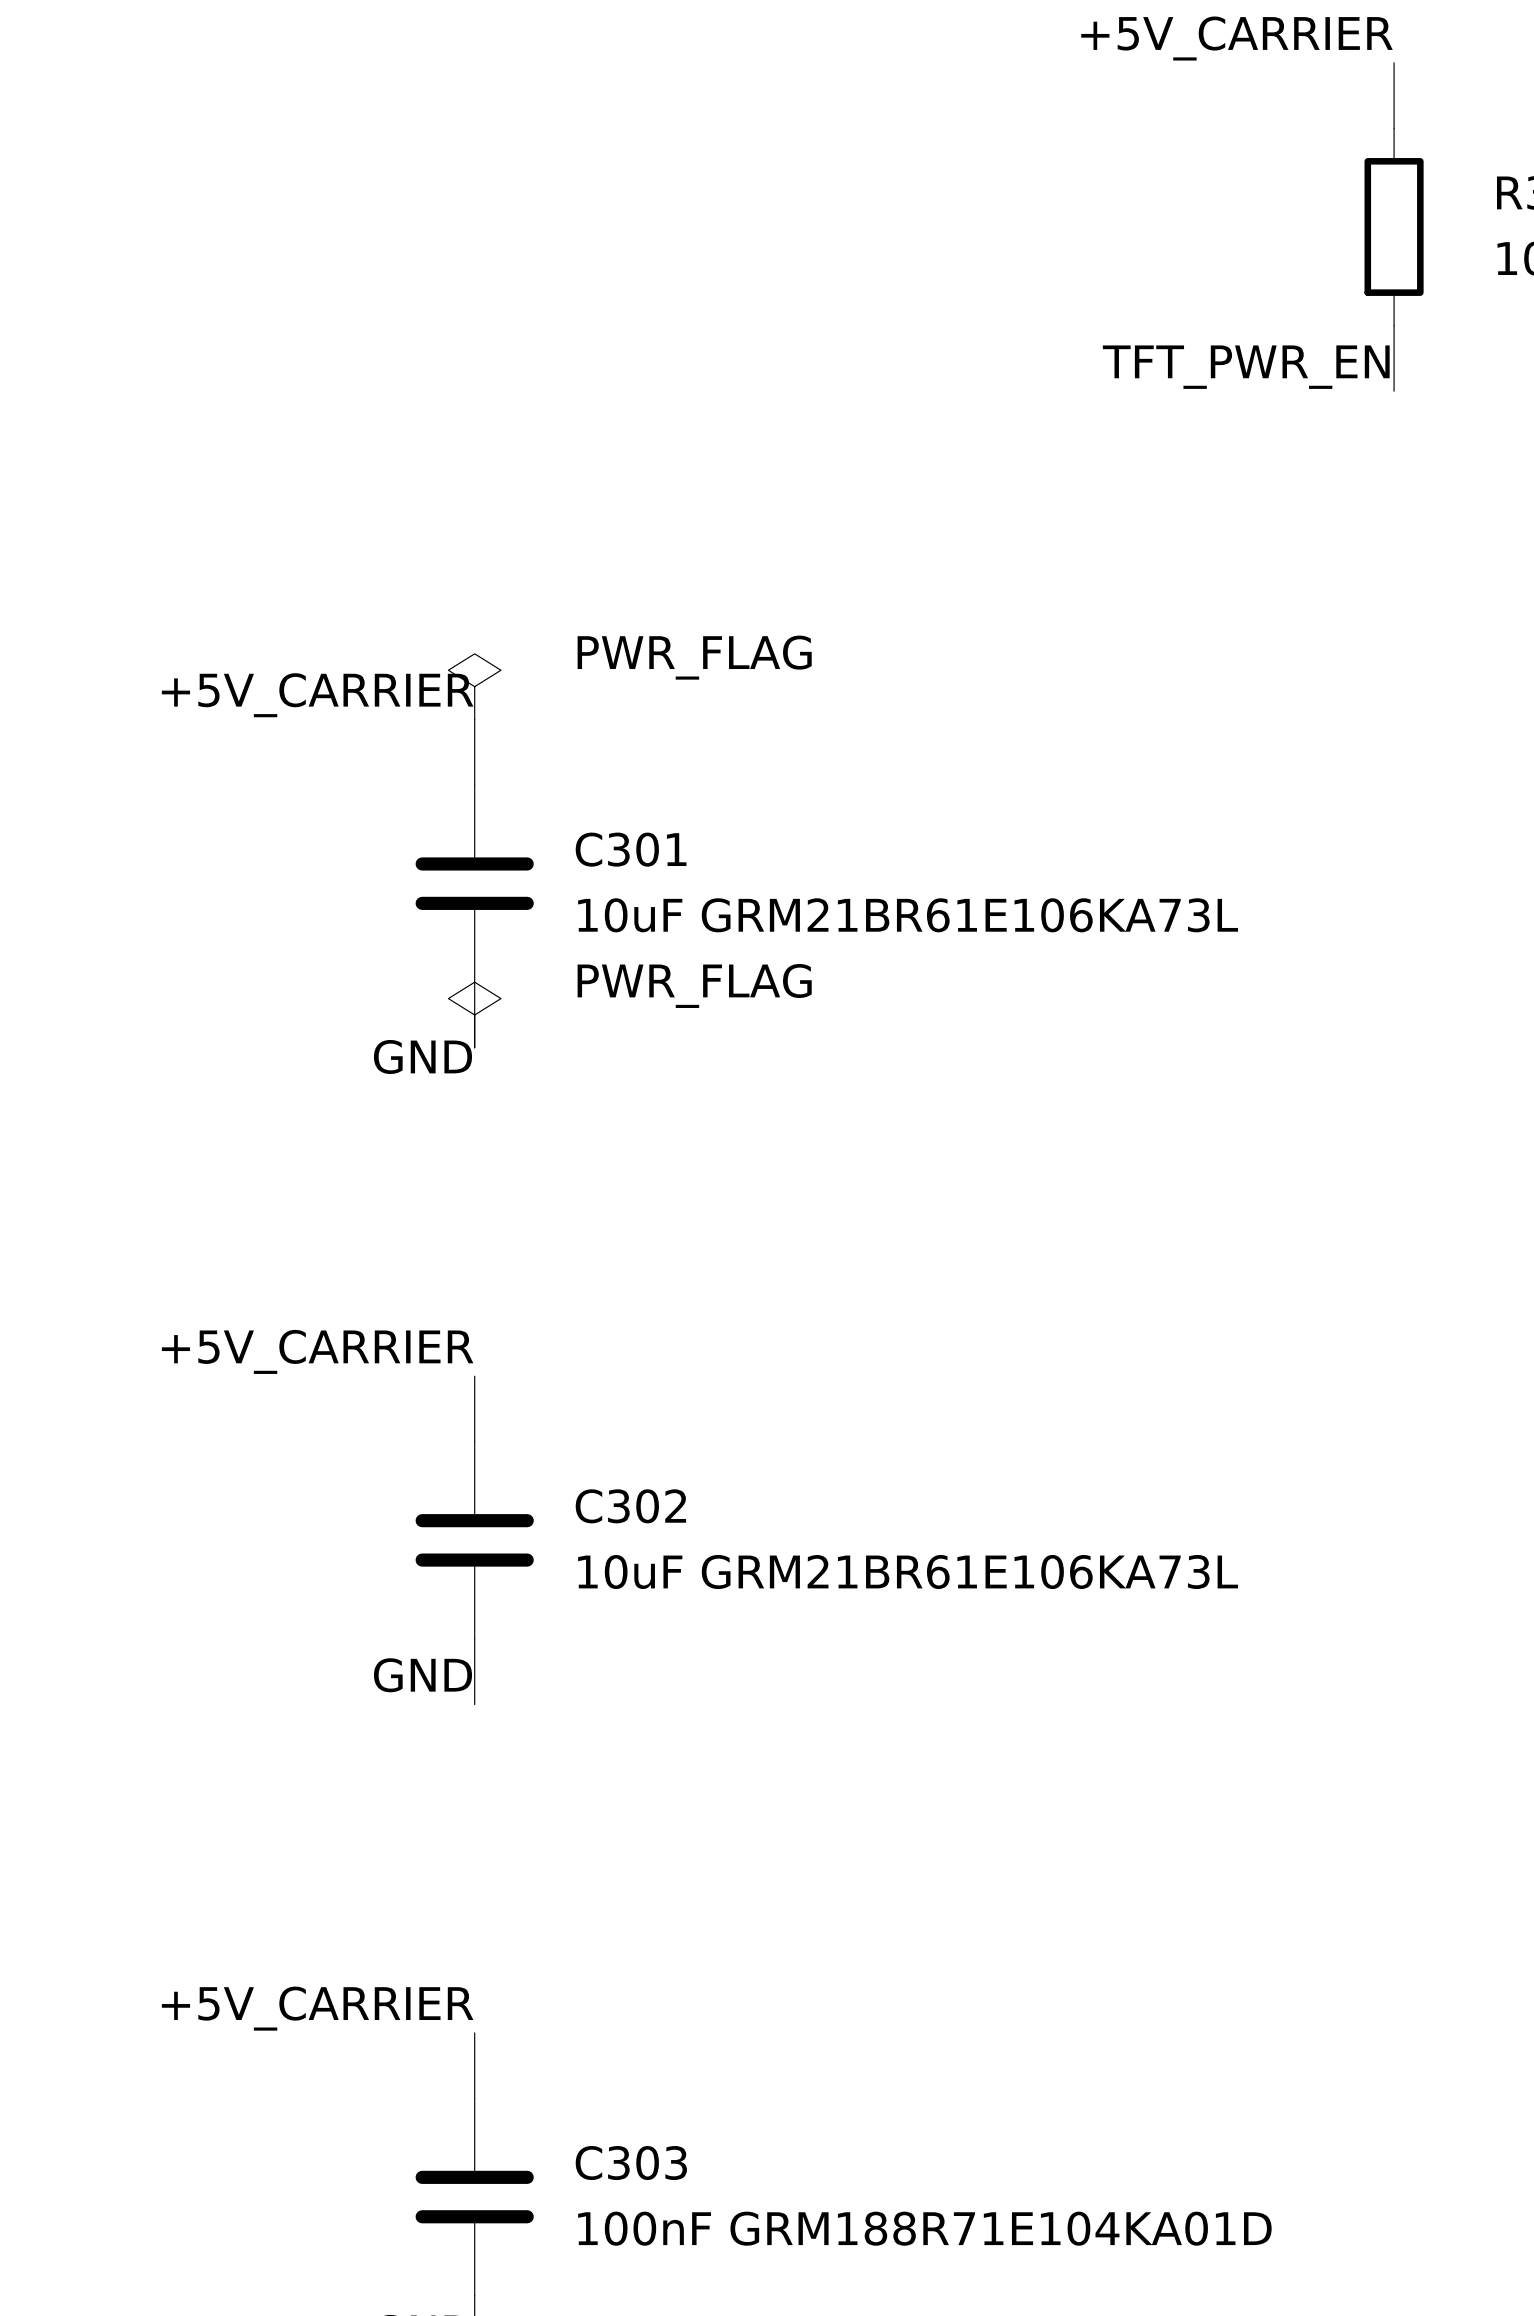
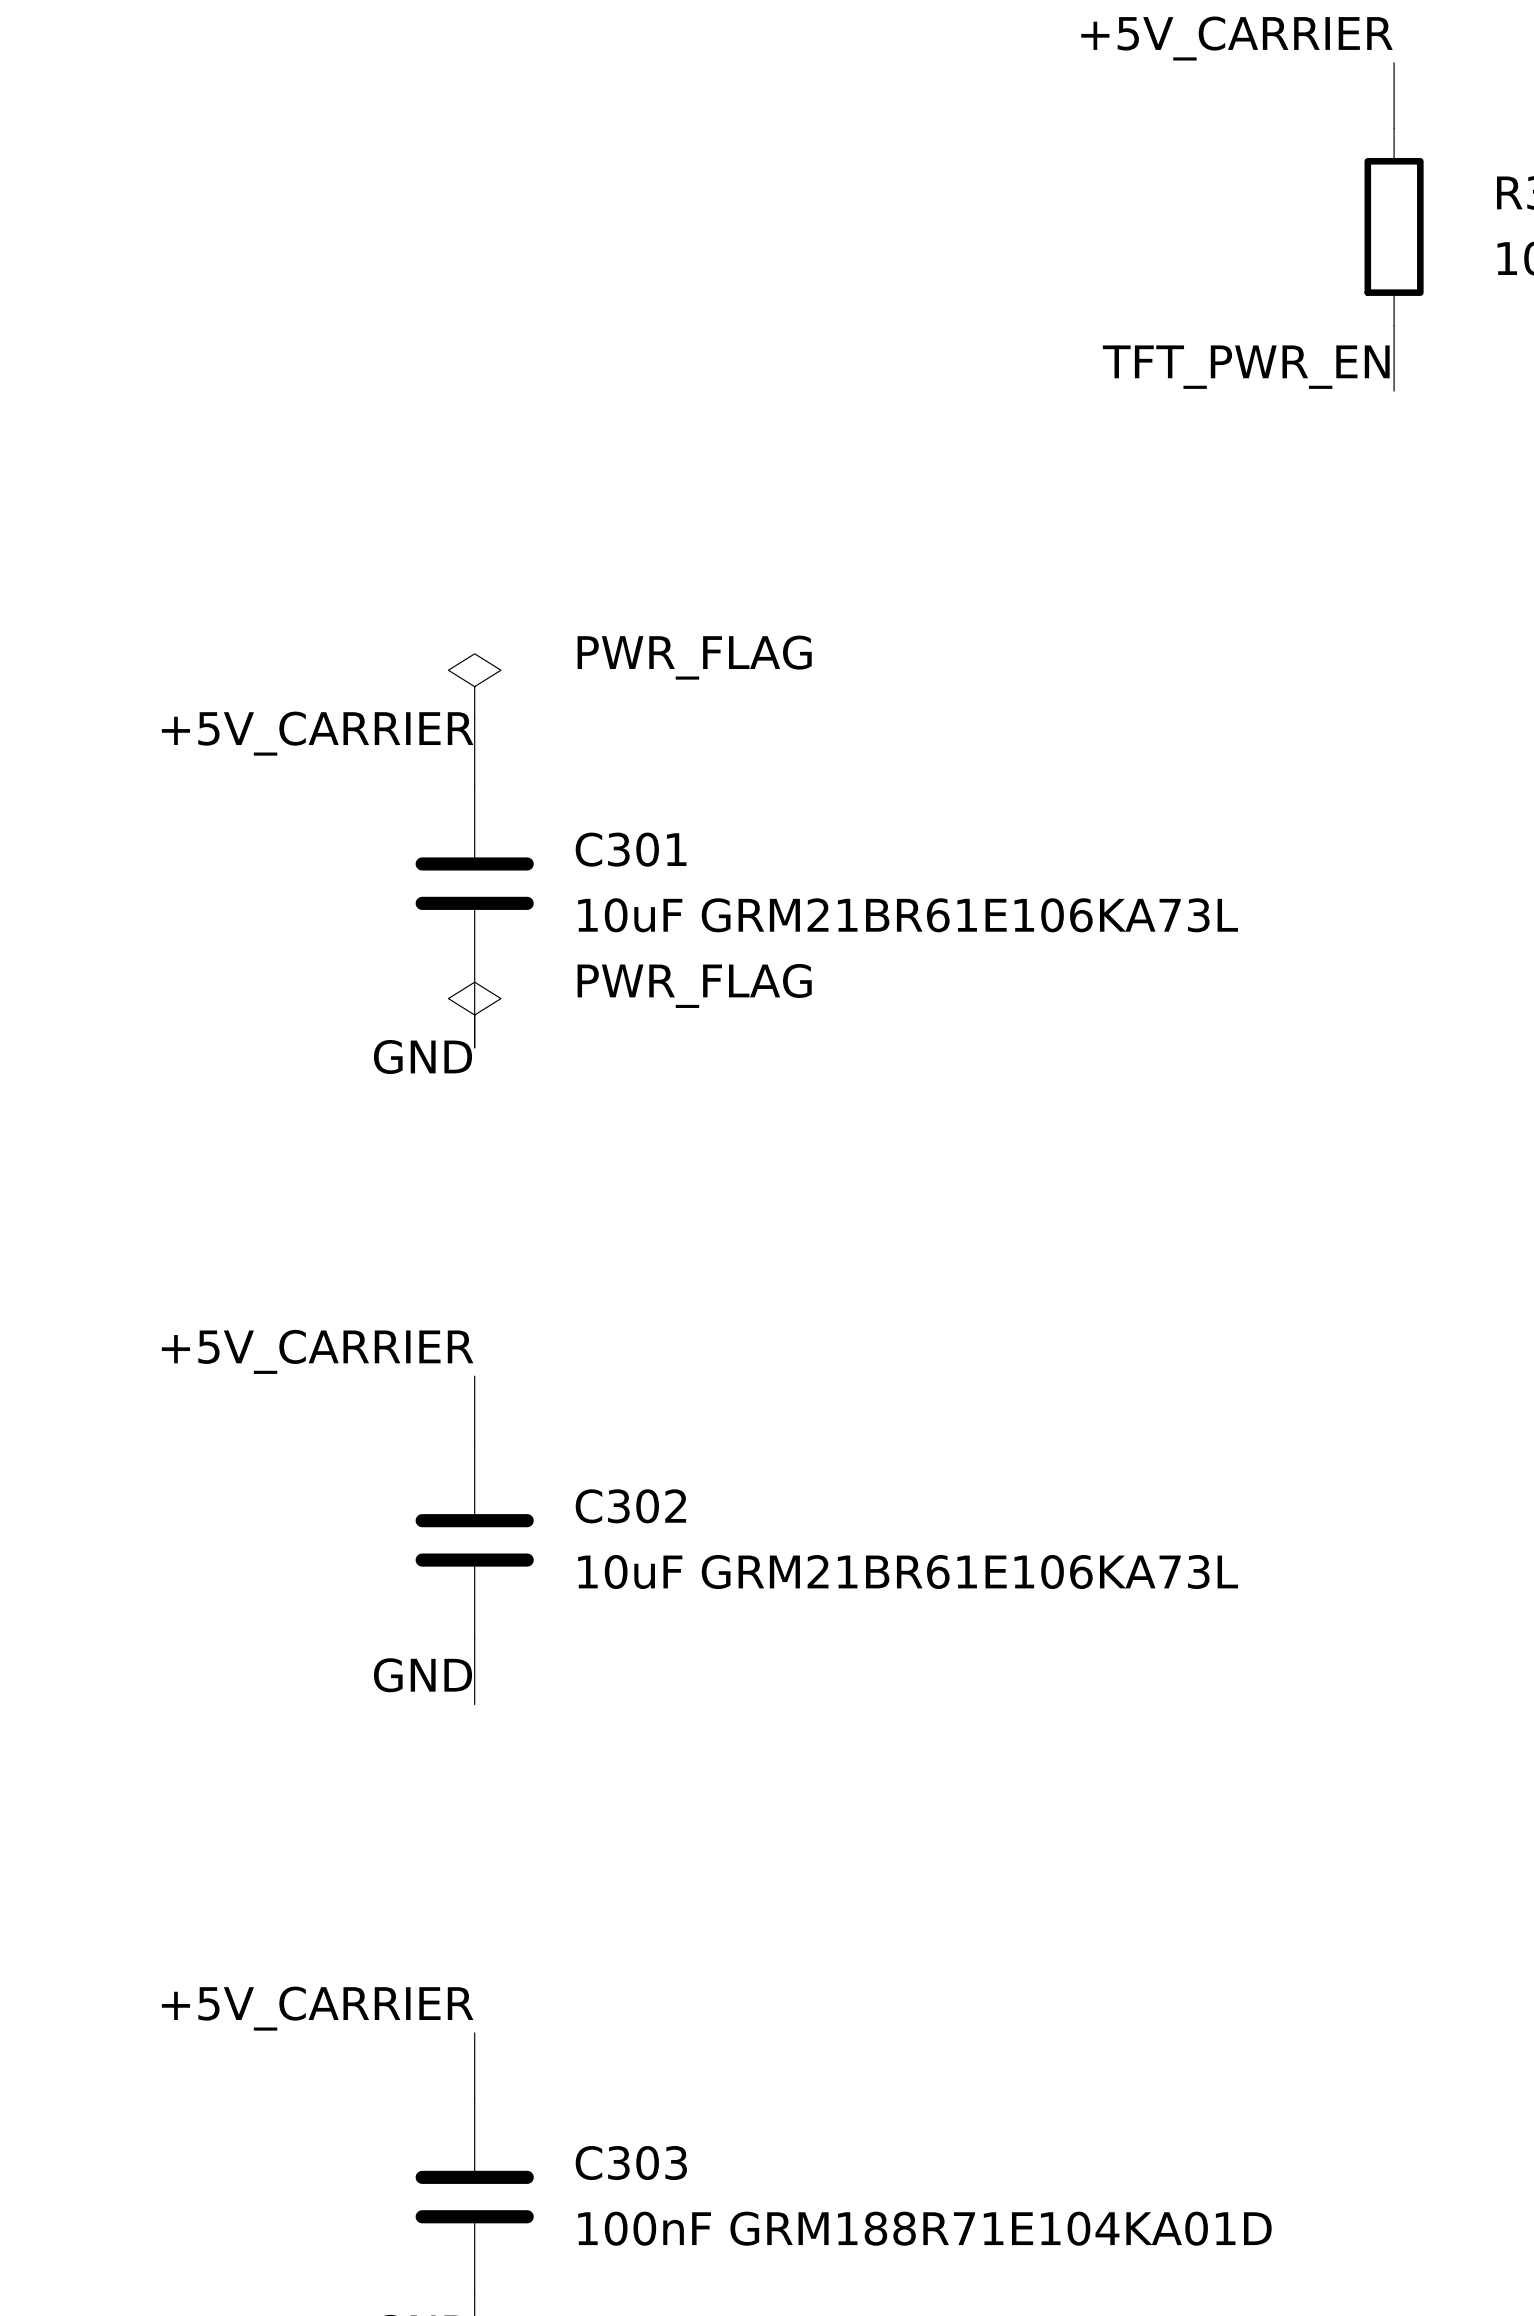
label position: +5V_CARRIER (317, 695) -> +5V_CARRIER (317, 733)

